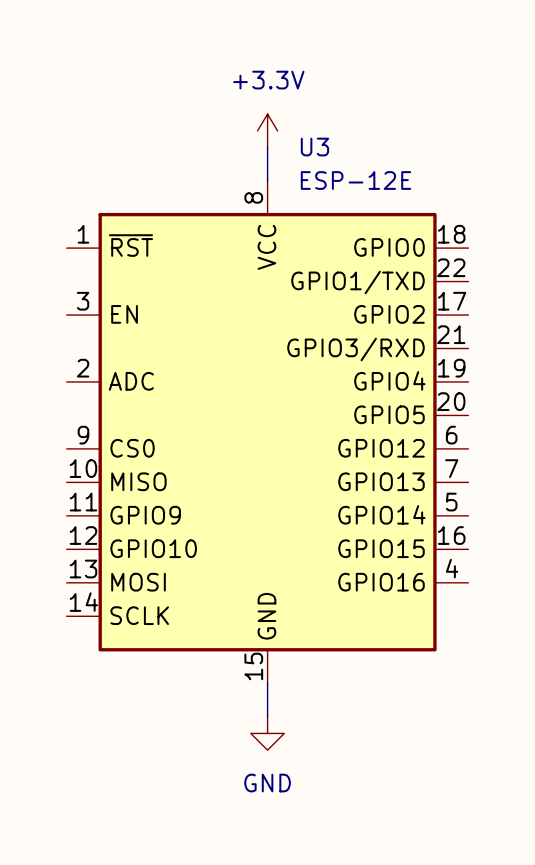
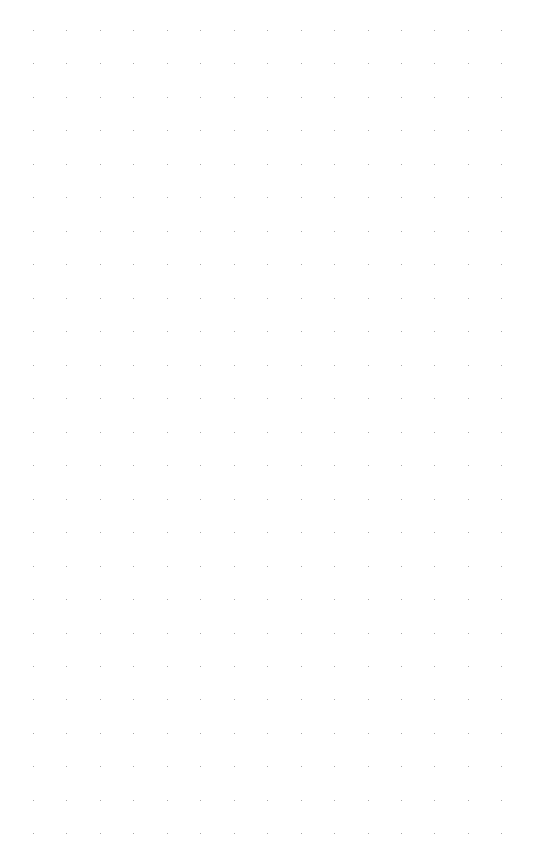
power symbol: +3.3V (267, 130) -> none
wire: (267, 147) (267, 181) -> none
U3: ESP-12E (267, 432) -> none
wire: (267, 683) (267, 716) -> none
power symbol: GND (267, 733) -> none

